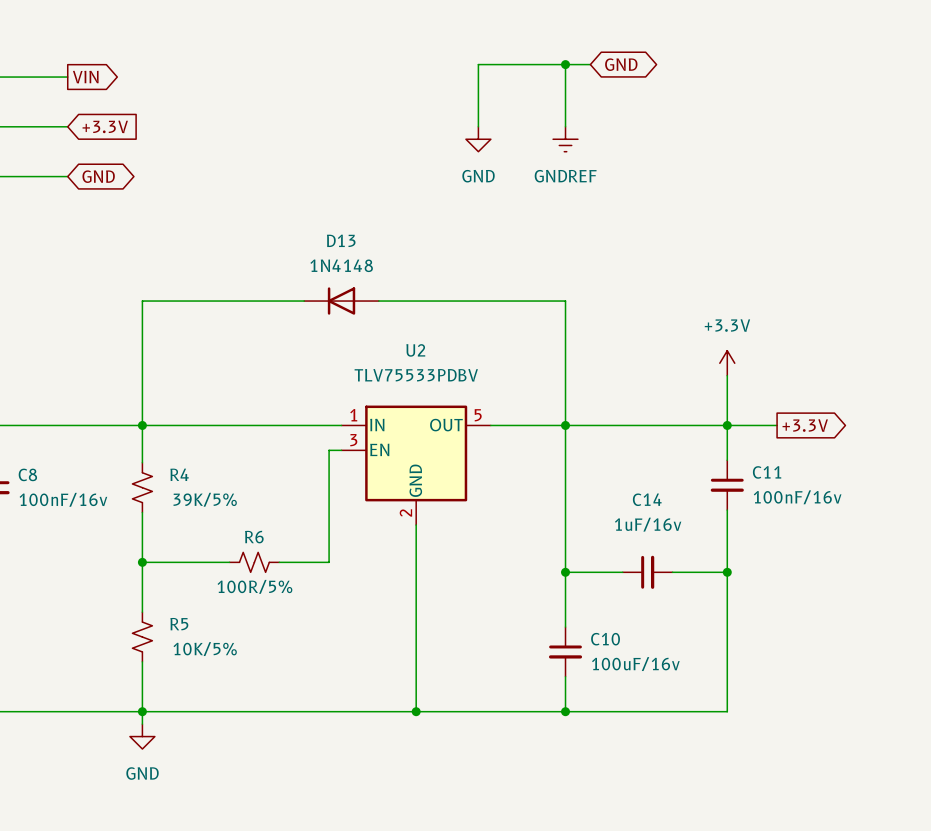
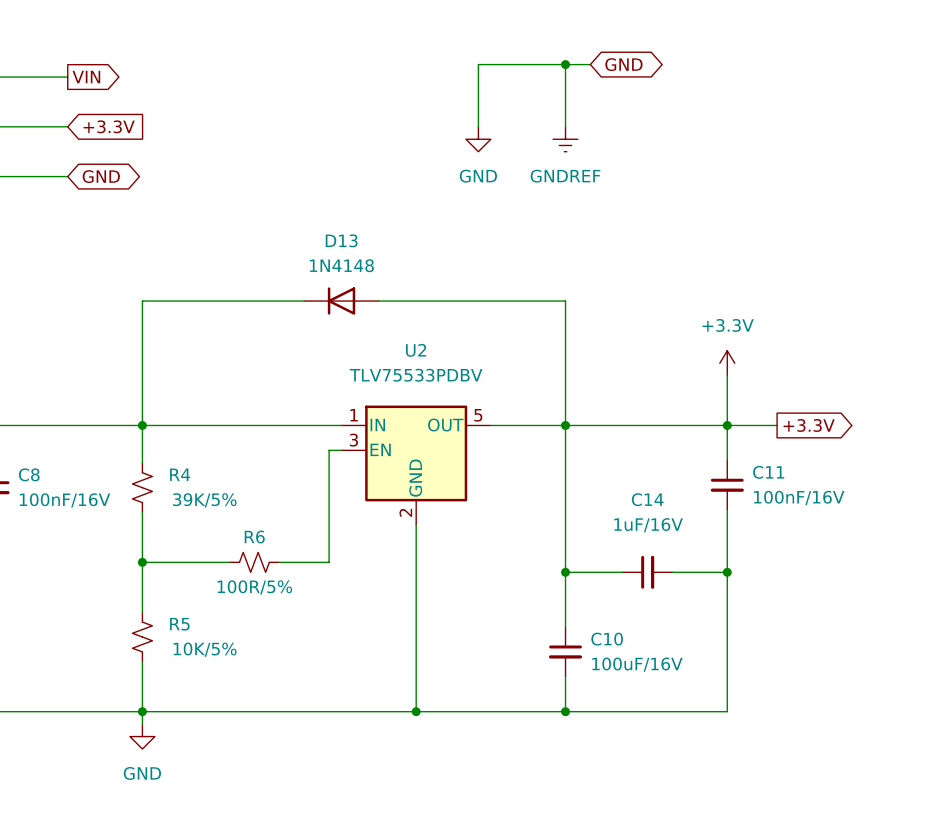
C11 value: 100nF/16v (797, 497) -> 100nF/16V (799, 497)
C8 value: 100nF/16v (63, 499) -> 100nF/16V (65, 500)
C14 value: 1uF/16v (648, 524) -> 1uF/16V (648, 525)
C10 value: 100uF/16v (635, 664) -> 100uF/16V (637, 664)

